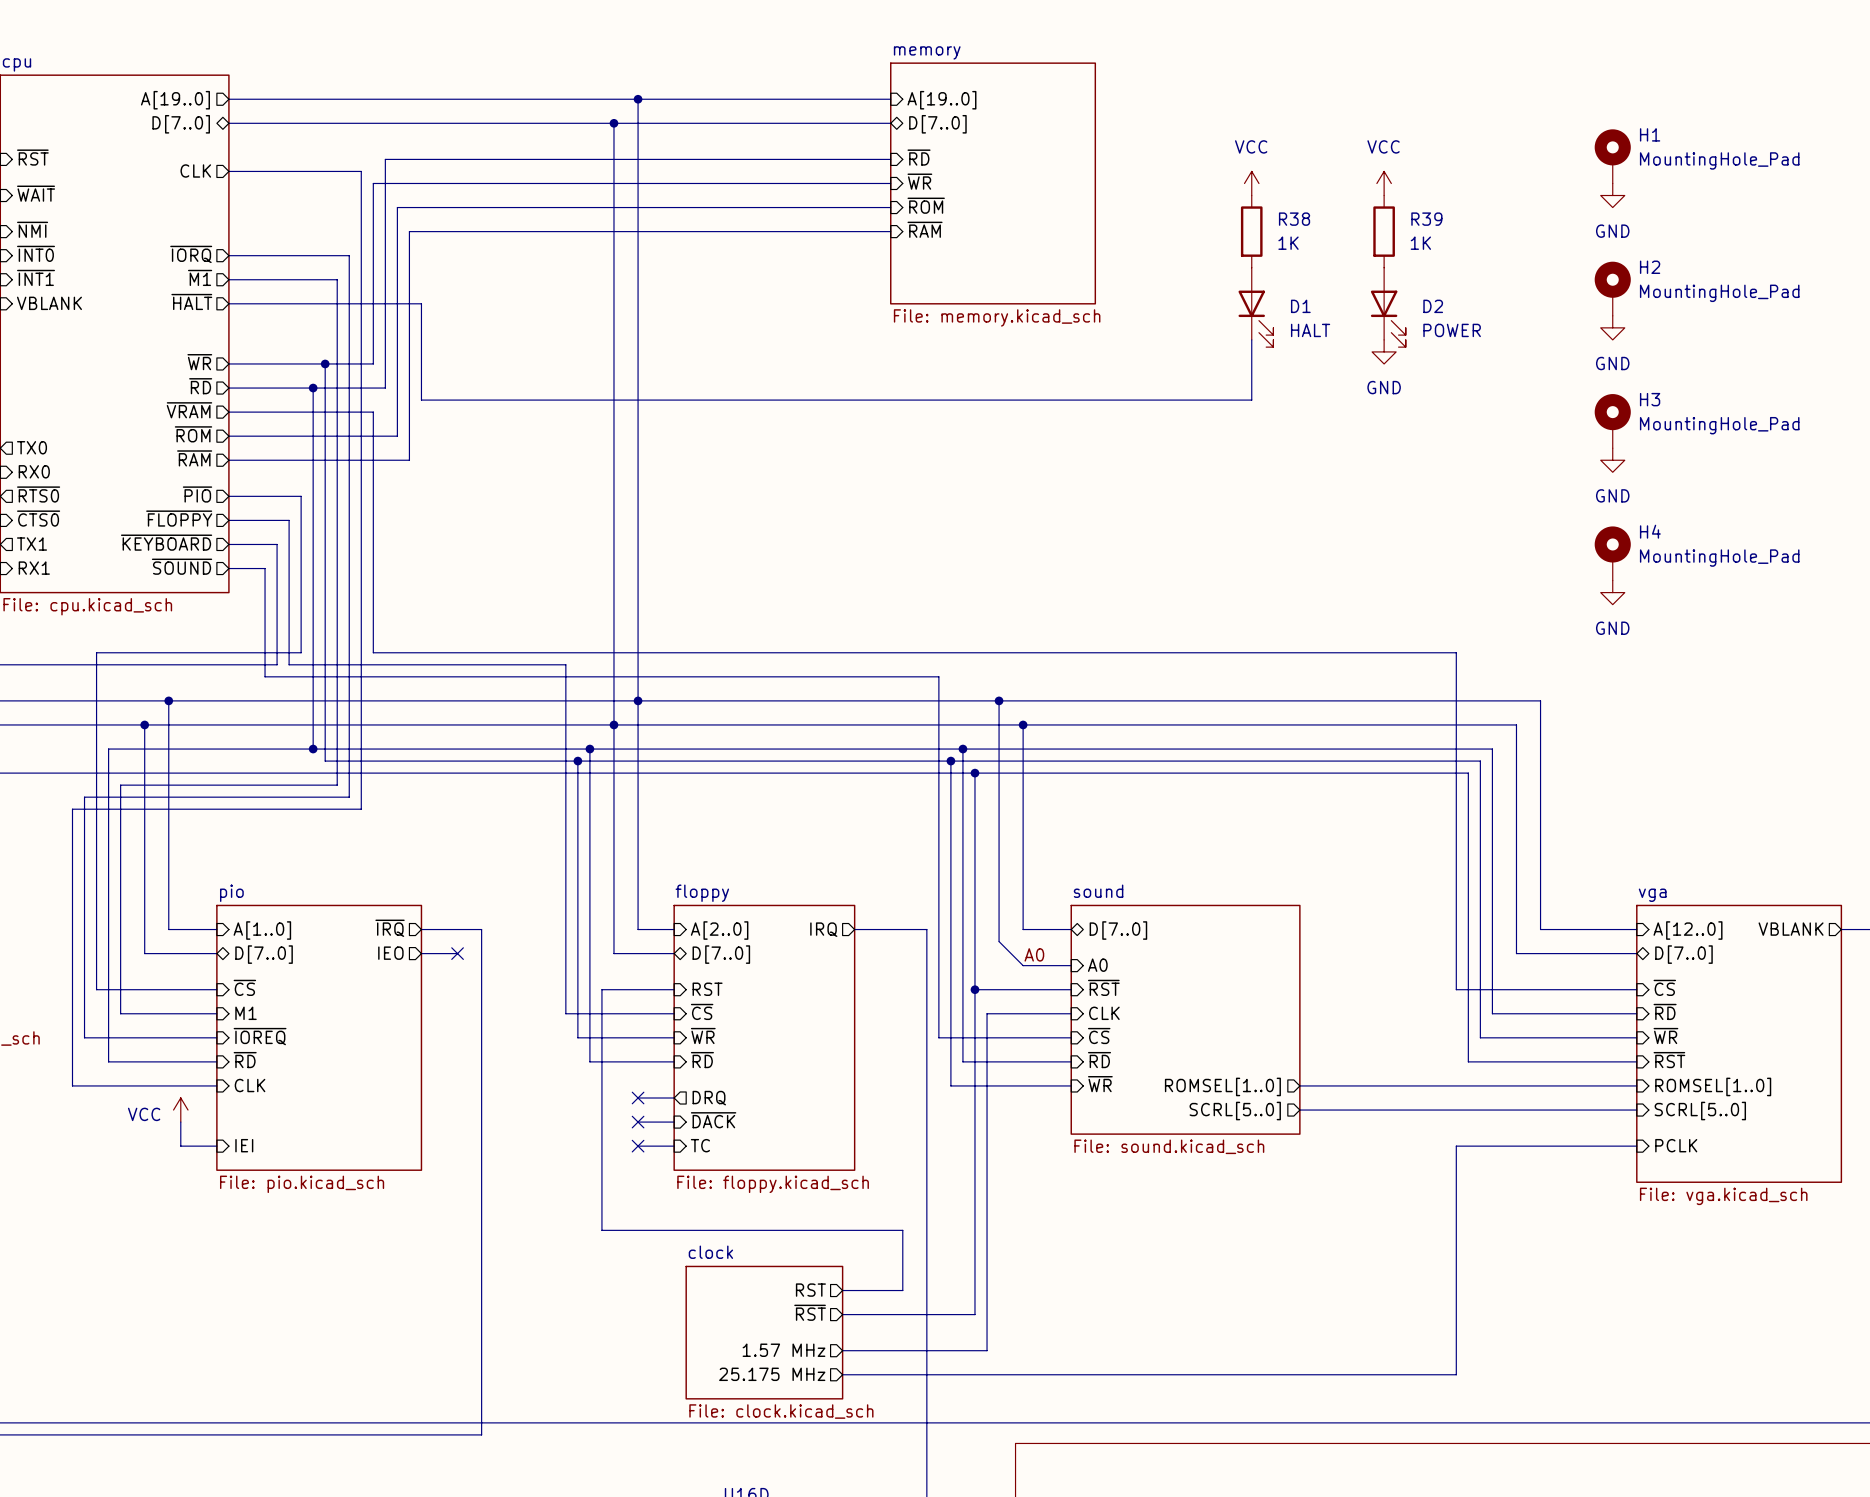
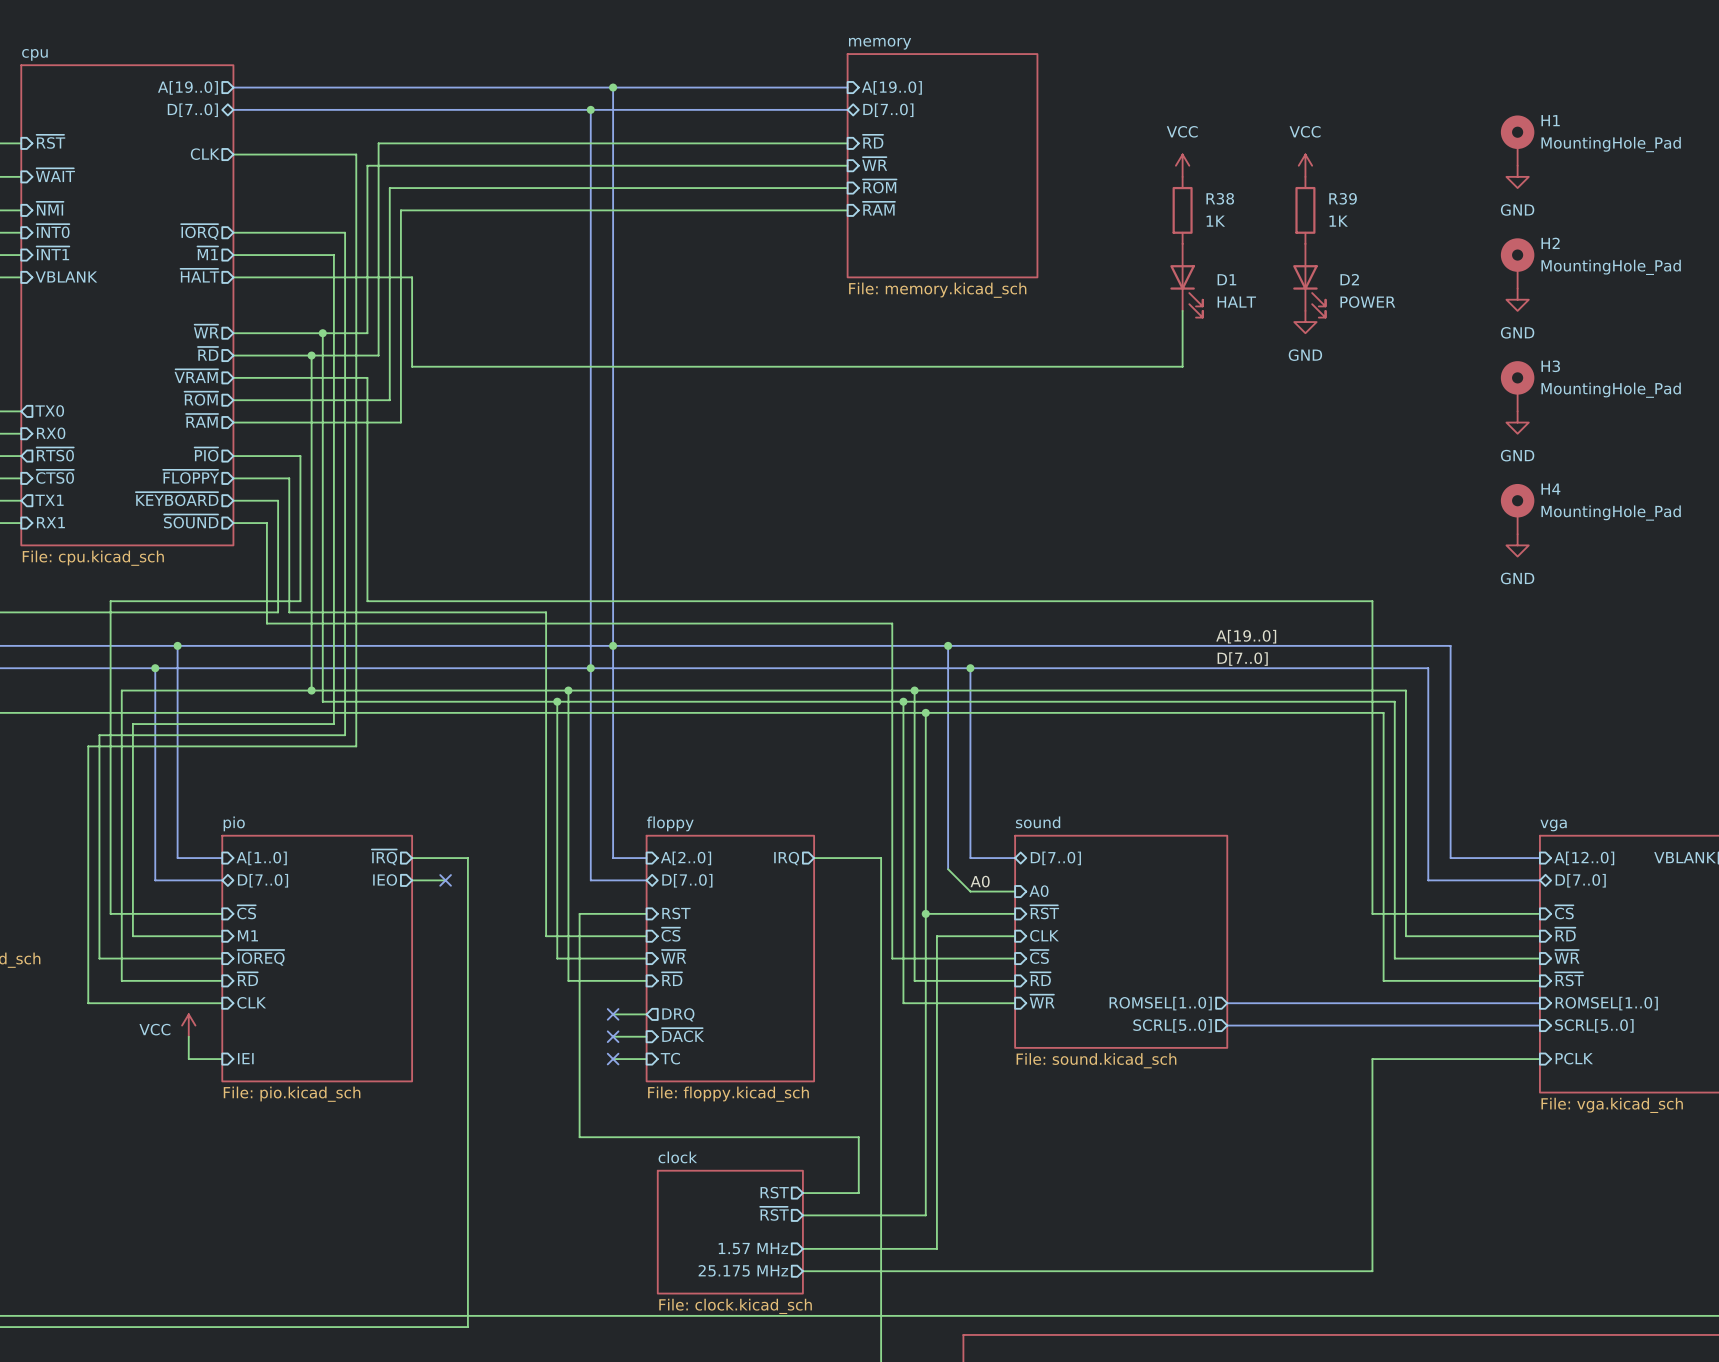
label: none -> A[19..0] (1246, 636)
label: none -> D[7..0] (1242, 659)

